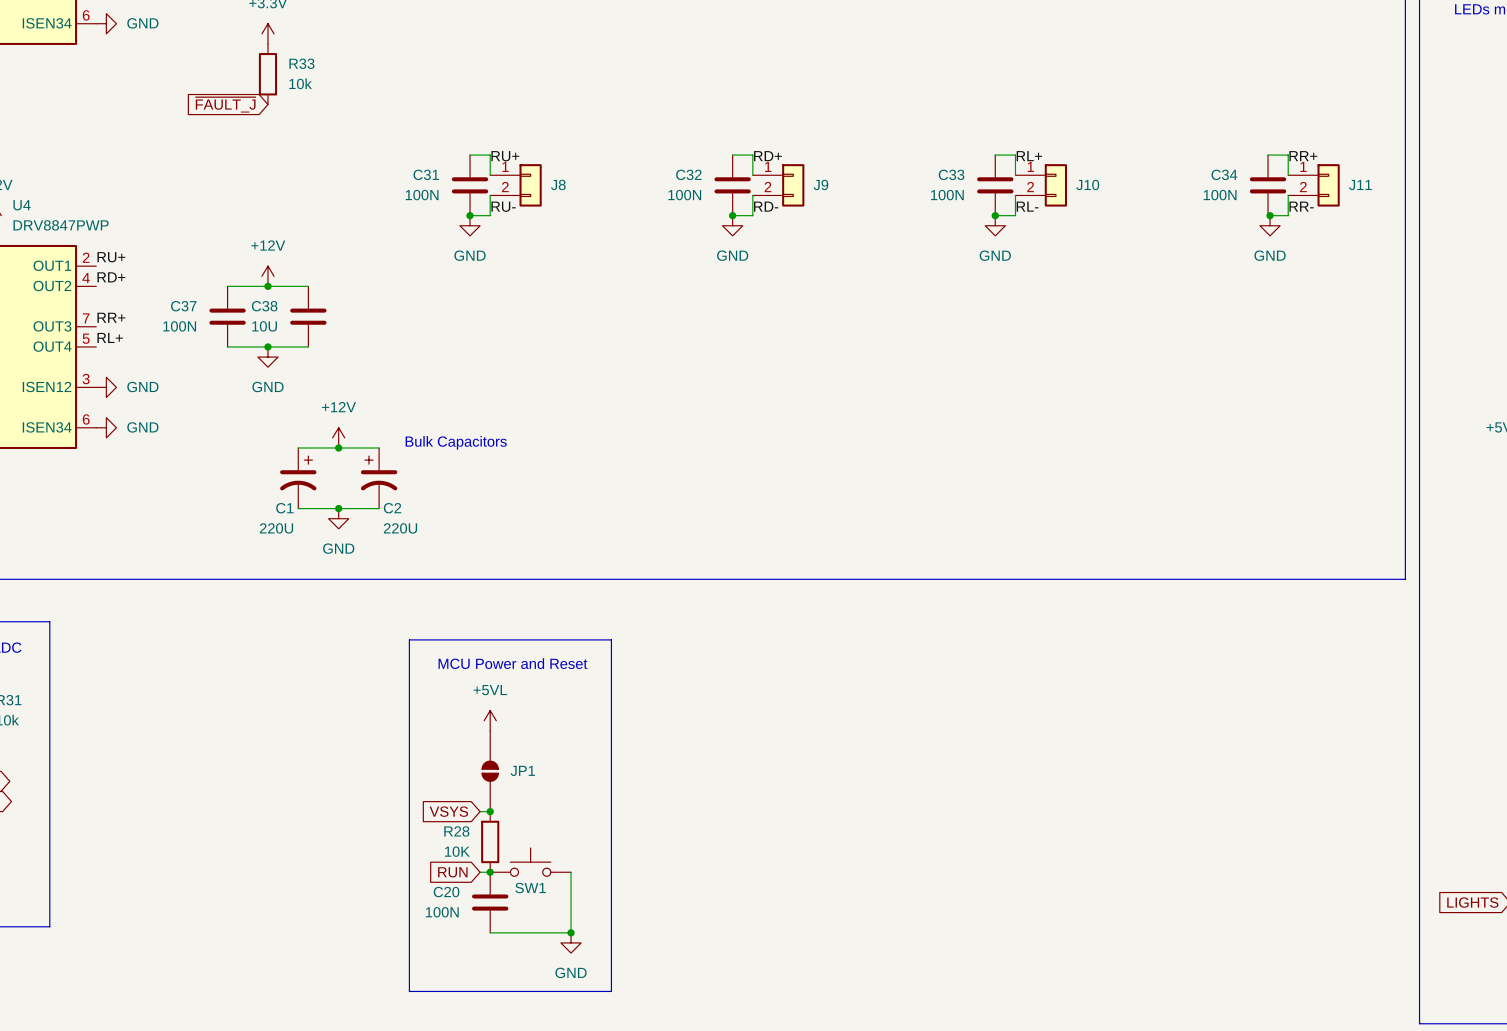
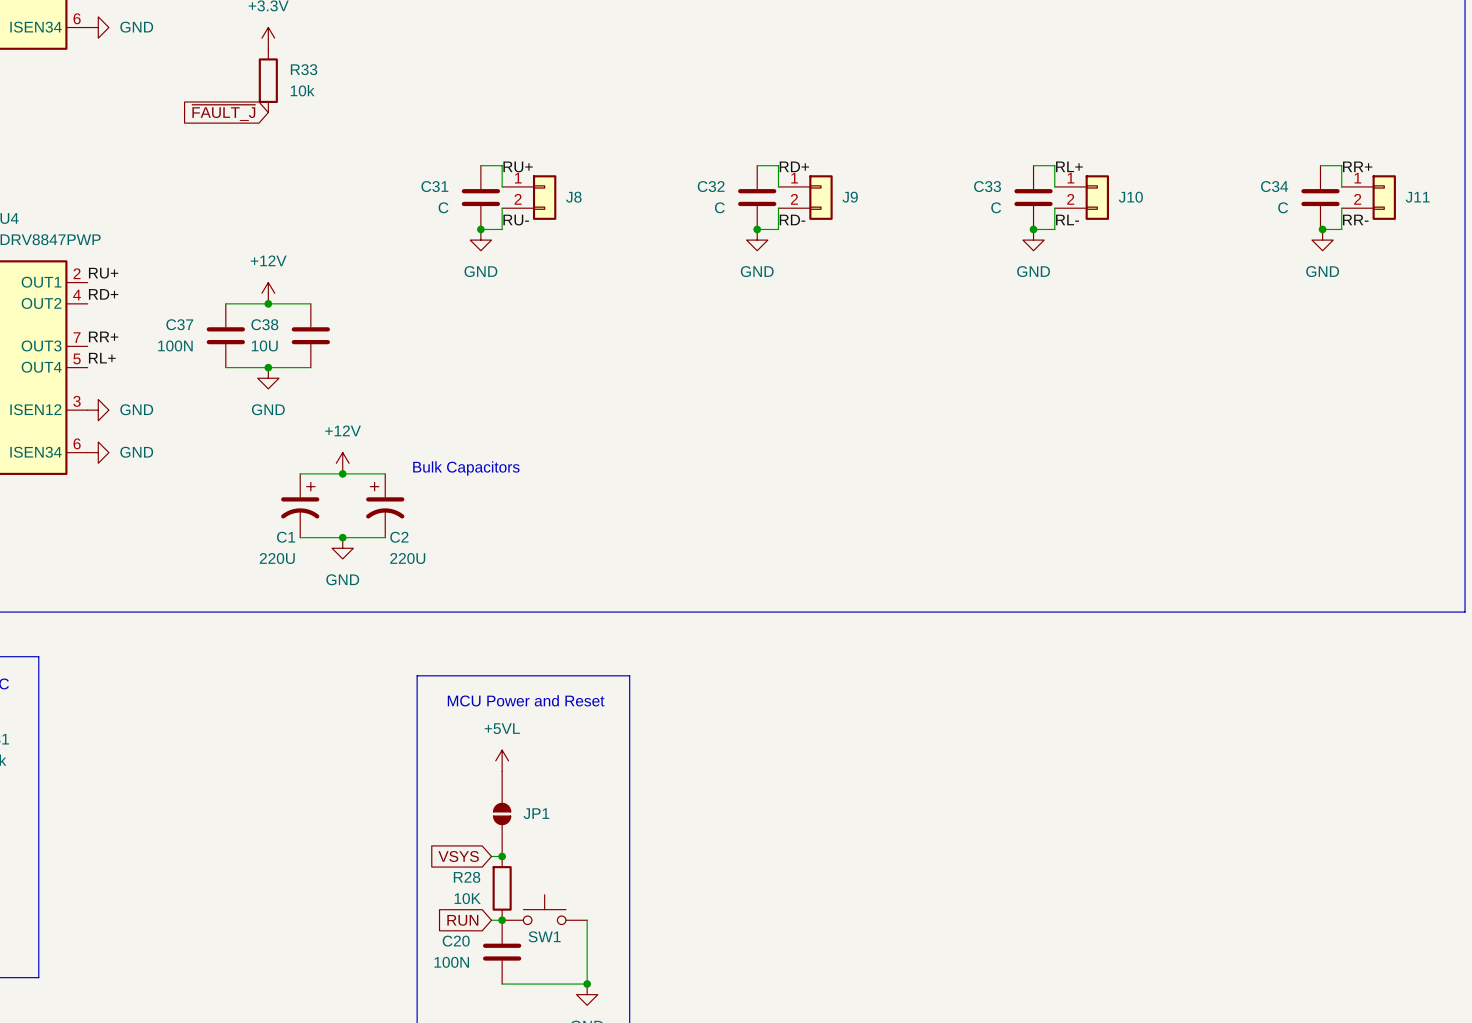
C31 value: 100N (422, 195) -> C (443, 207)
C32 value: 100N (684, 195) -> C (719, 207)
C33 value: 100N (947, 195) -> C (996, 207)
C34 value: 100N (1220, 195) -> C (1283, 207)

